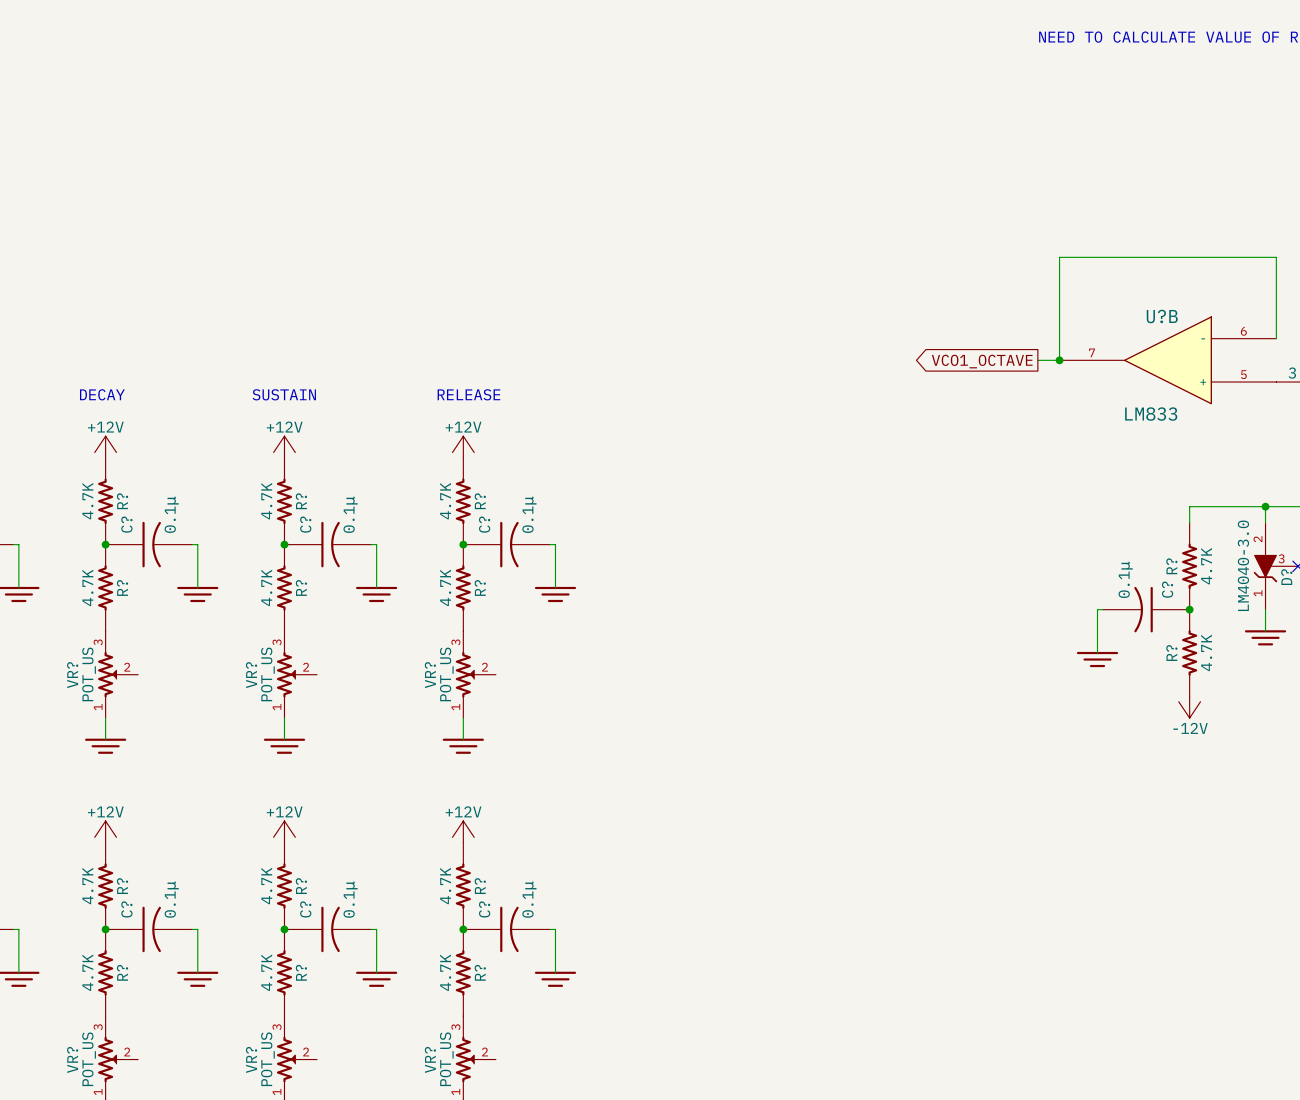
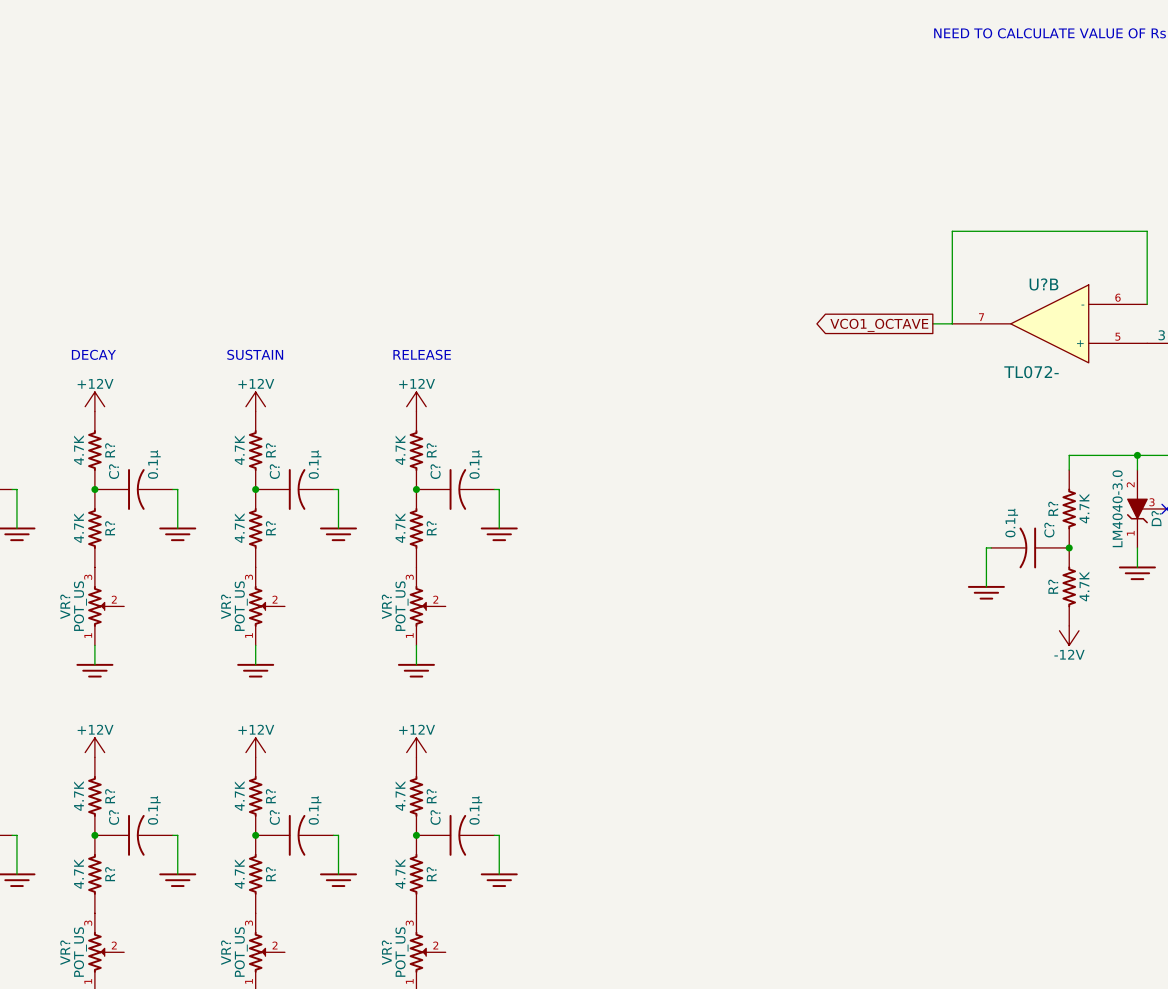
junction: (1059, 360) -> none
U?B value: LM833 (1151, 414) -> TL072- (1031, 372)

